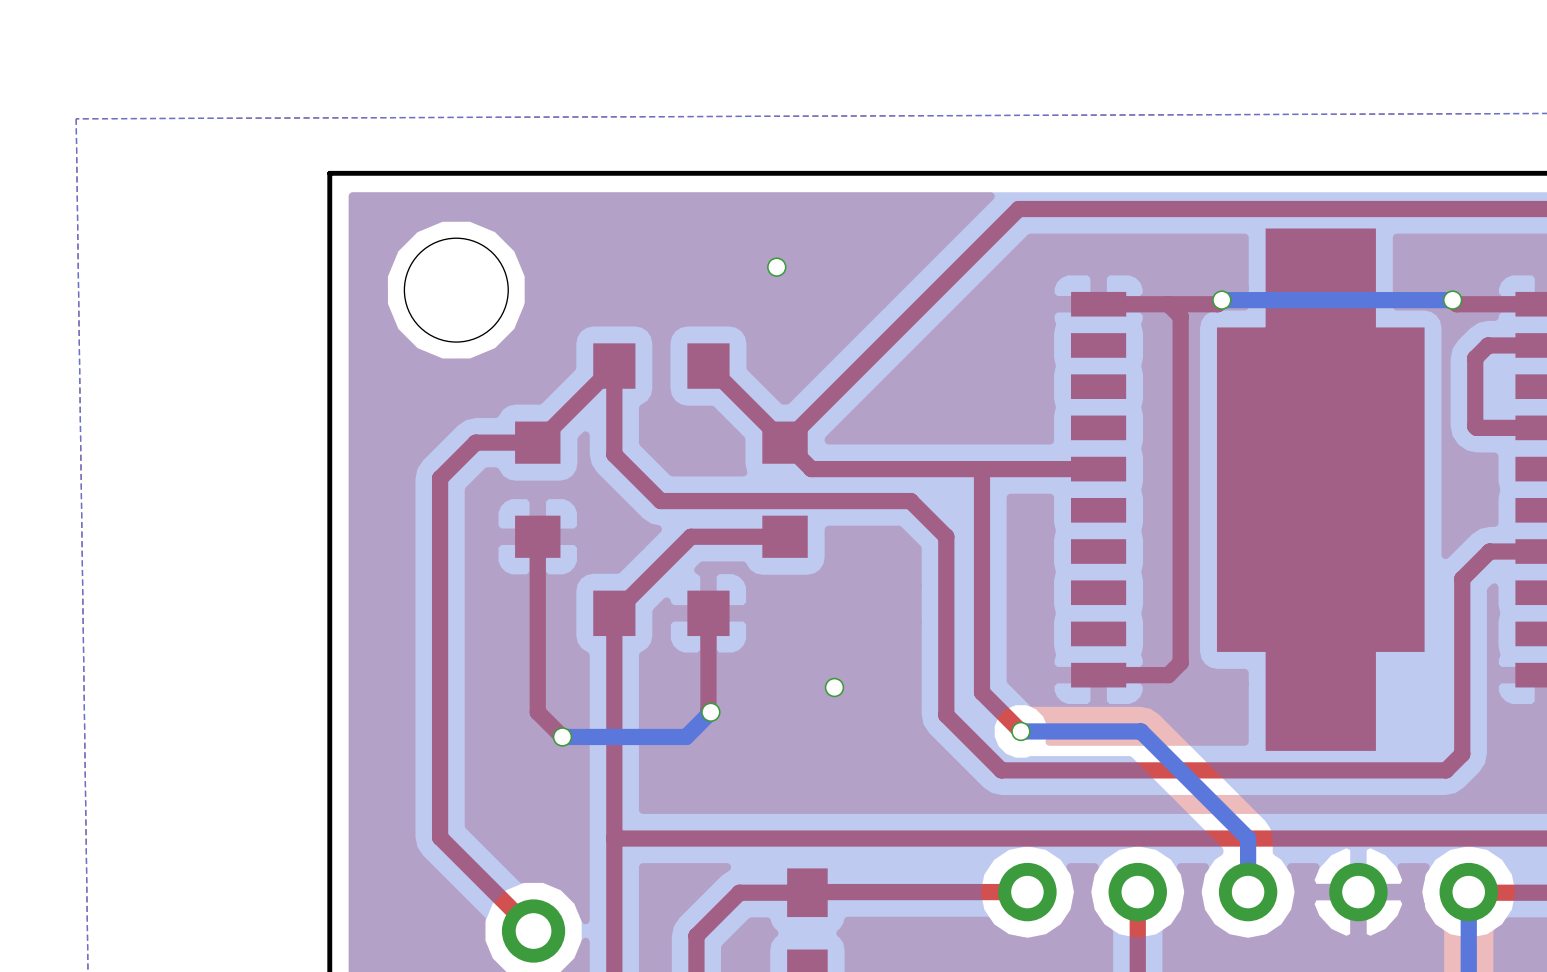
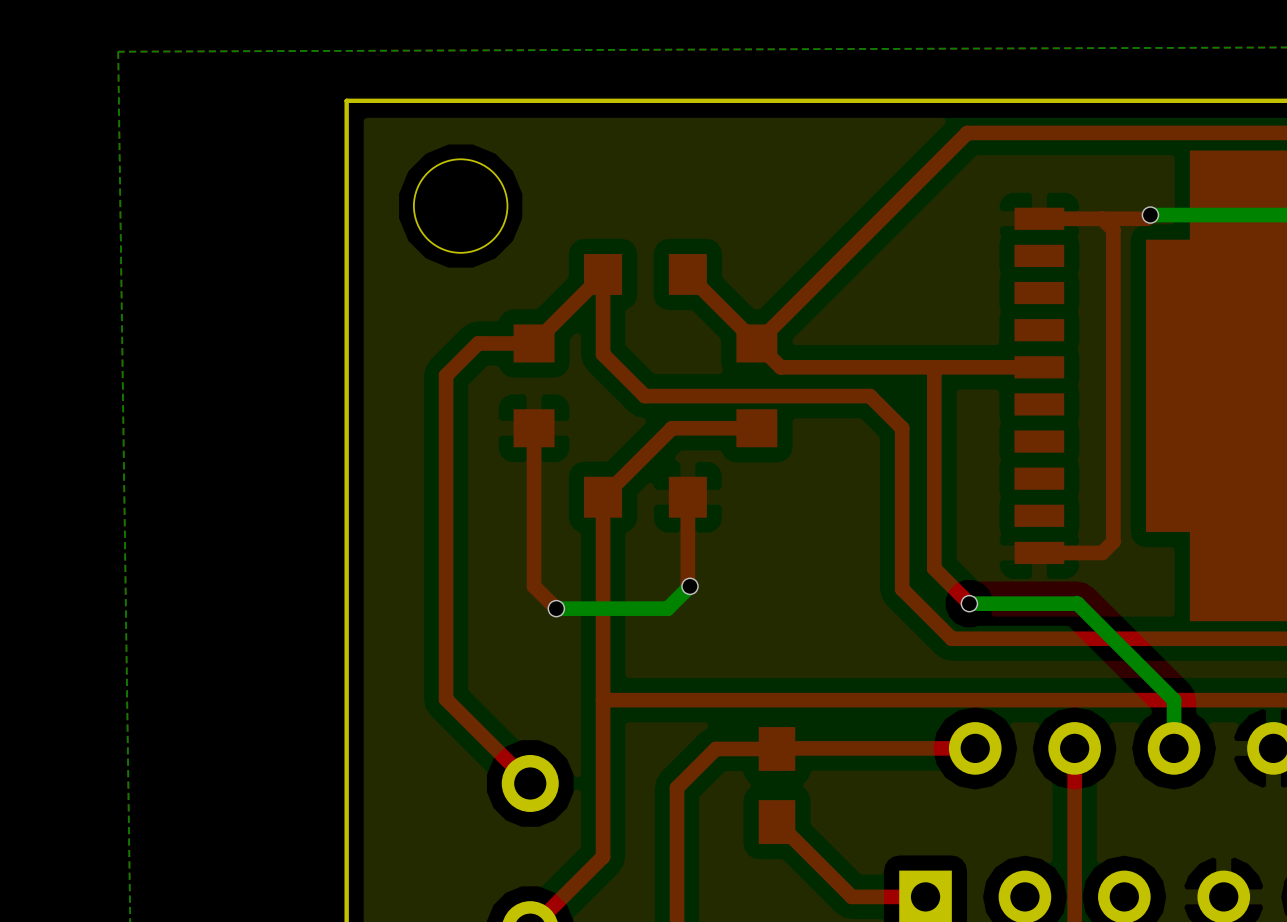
via: (776, 267) -> none
via: (834, 687) -> none

